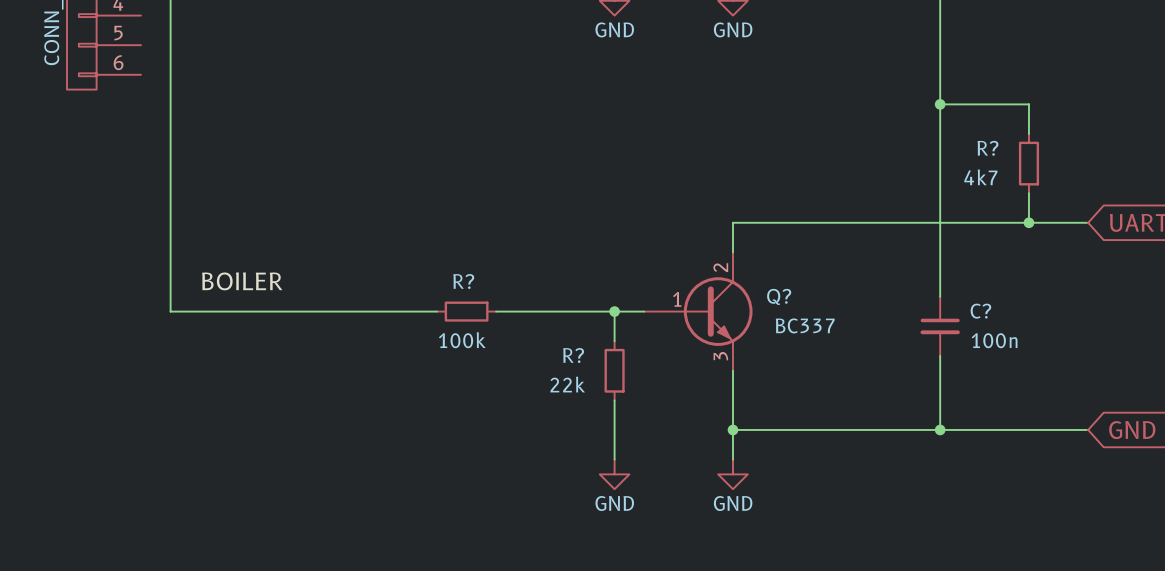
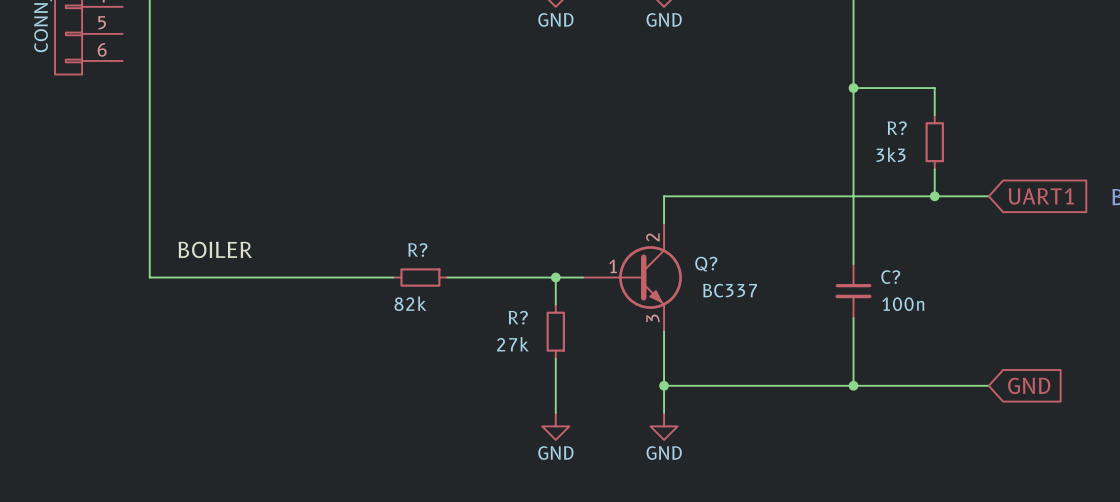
R? value: 4k7 (980, 177) -> 3k3 (891, 154)
R? value: 100k (462, 340) -> 82k (410, 303)
R? value: 22k (567, 384) -> 27k (512, 344)

